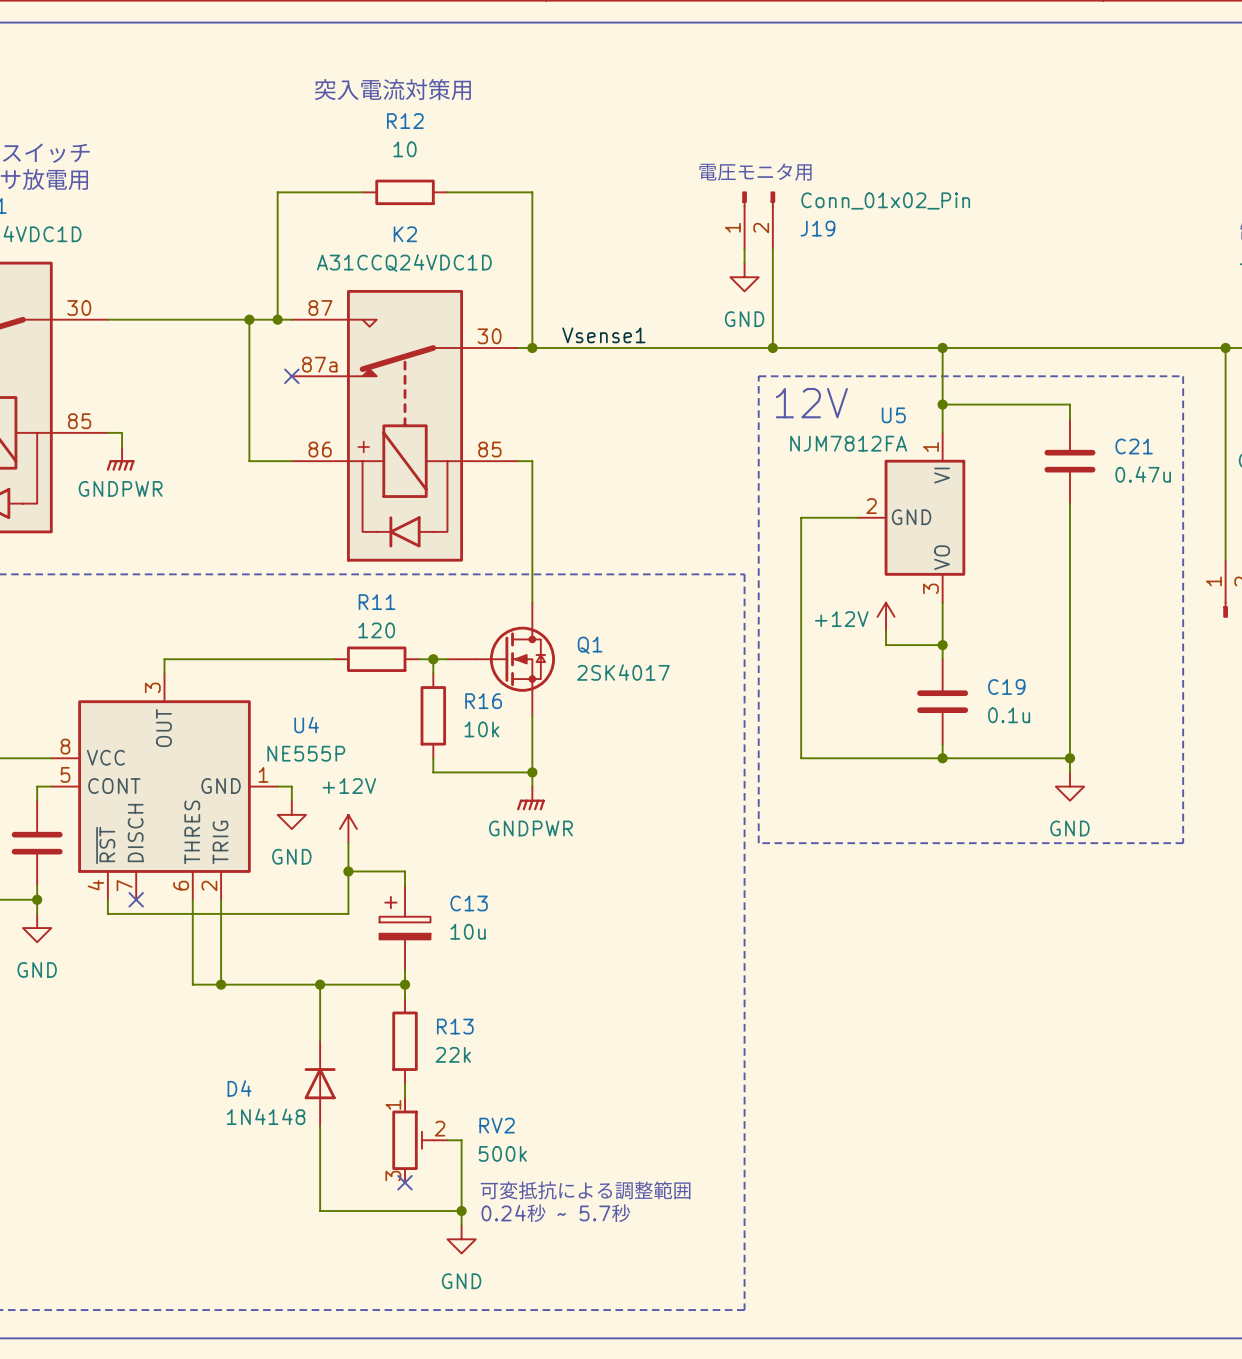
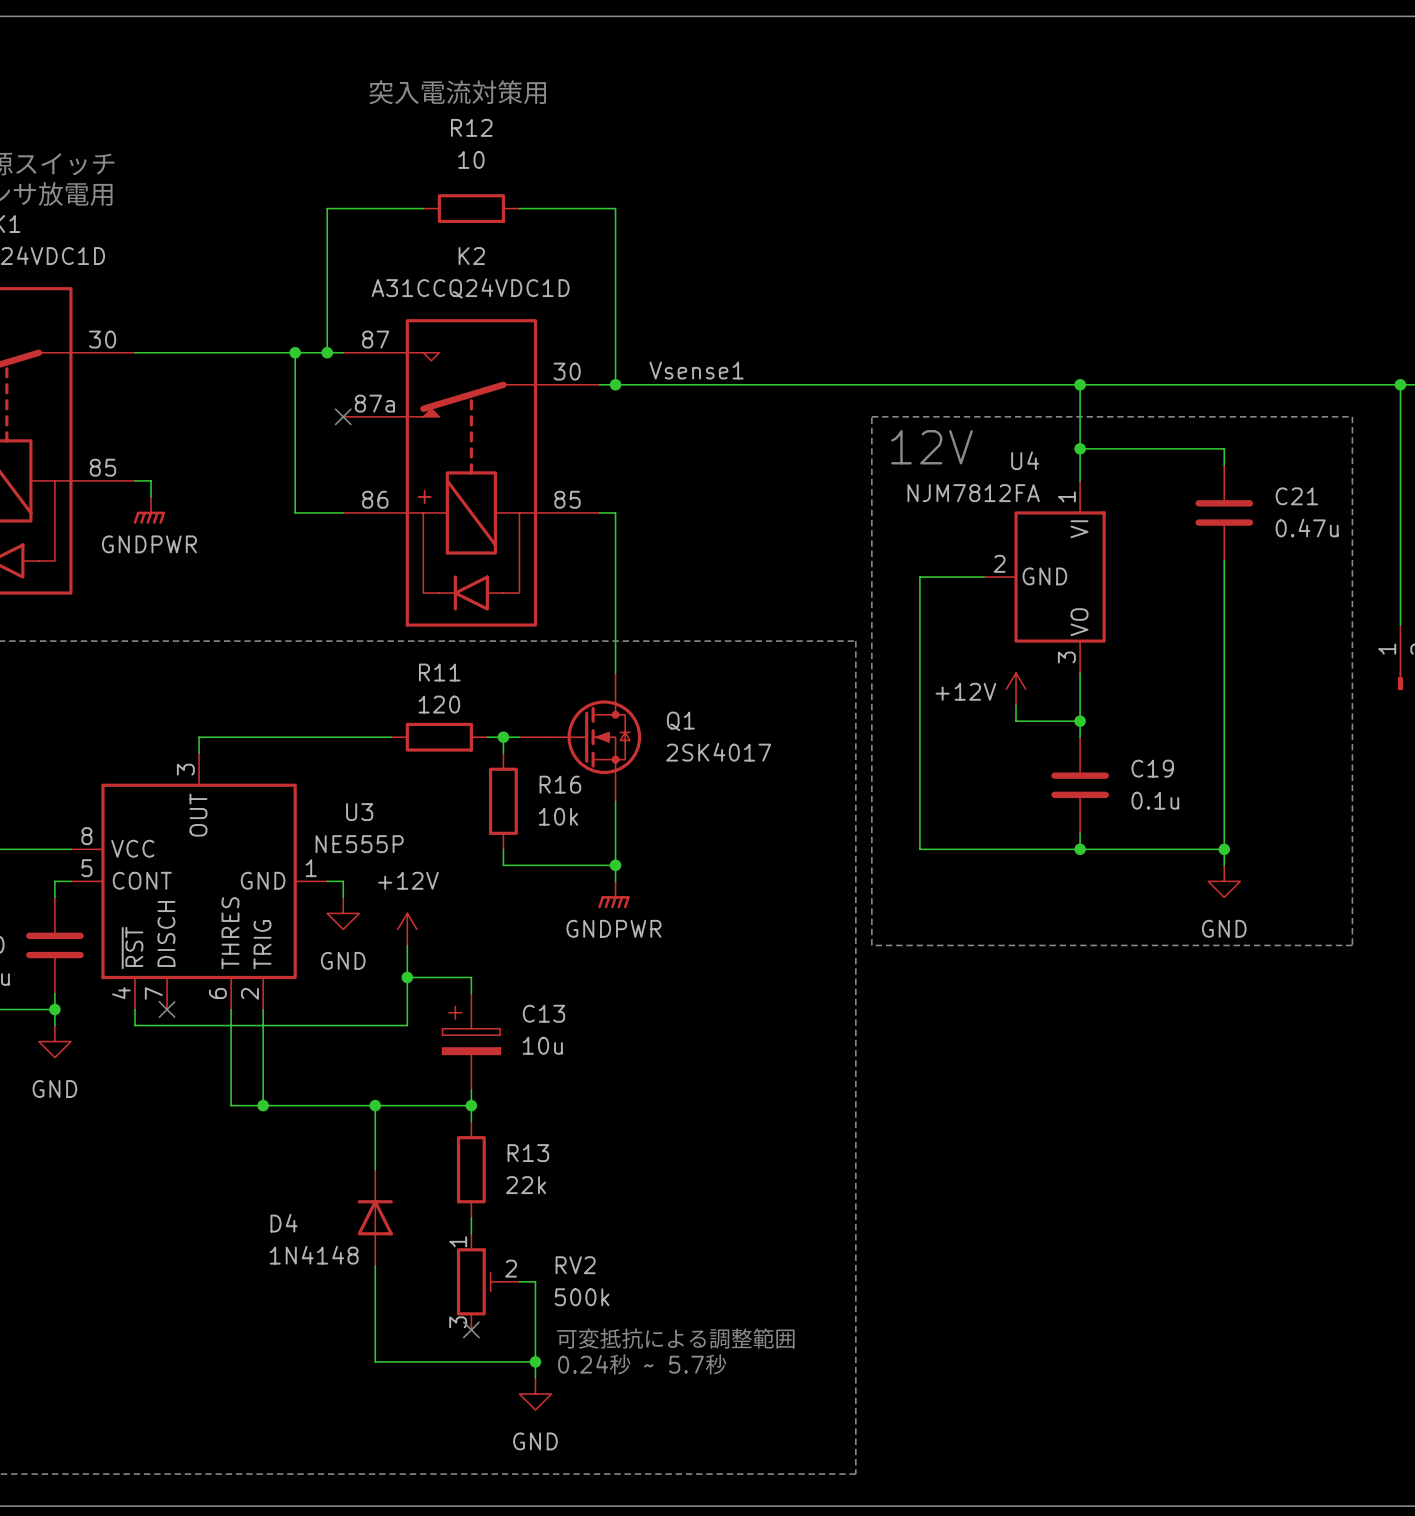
text: 電圧モニタ用 (755, 172) -> none
J19: Conn_01x02_Pin (758, 220) -> none
wire: (744, 248) (744, 263) -> none
wire: (772, 248) (772, 347) -> none
power symbol: GND (744, 277) -> none
junction: (772, 347) -> none
U5 name: U5 (893, 415) -> U4 (1025, 460)
U4 name: U4 (306, 725) -> U3 (359, 812)

